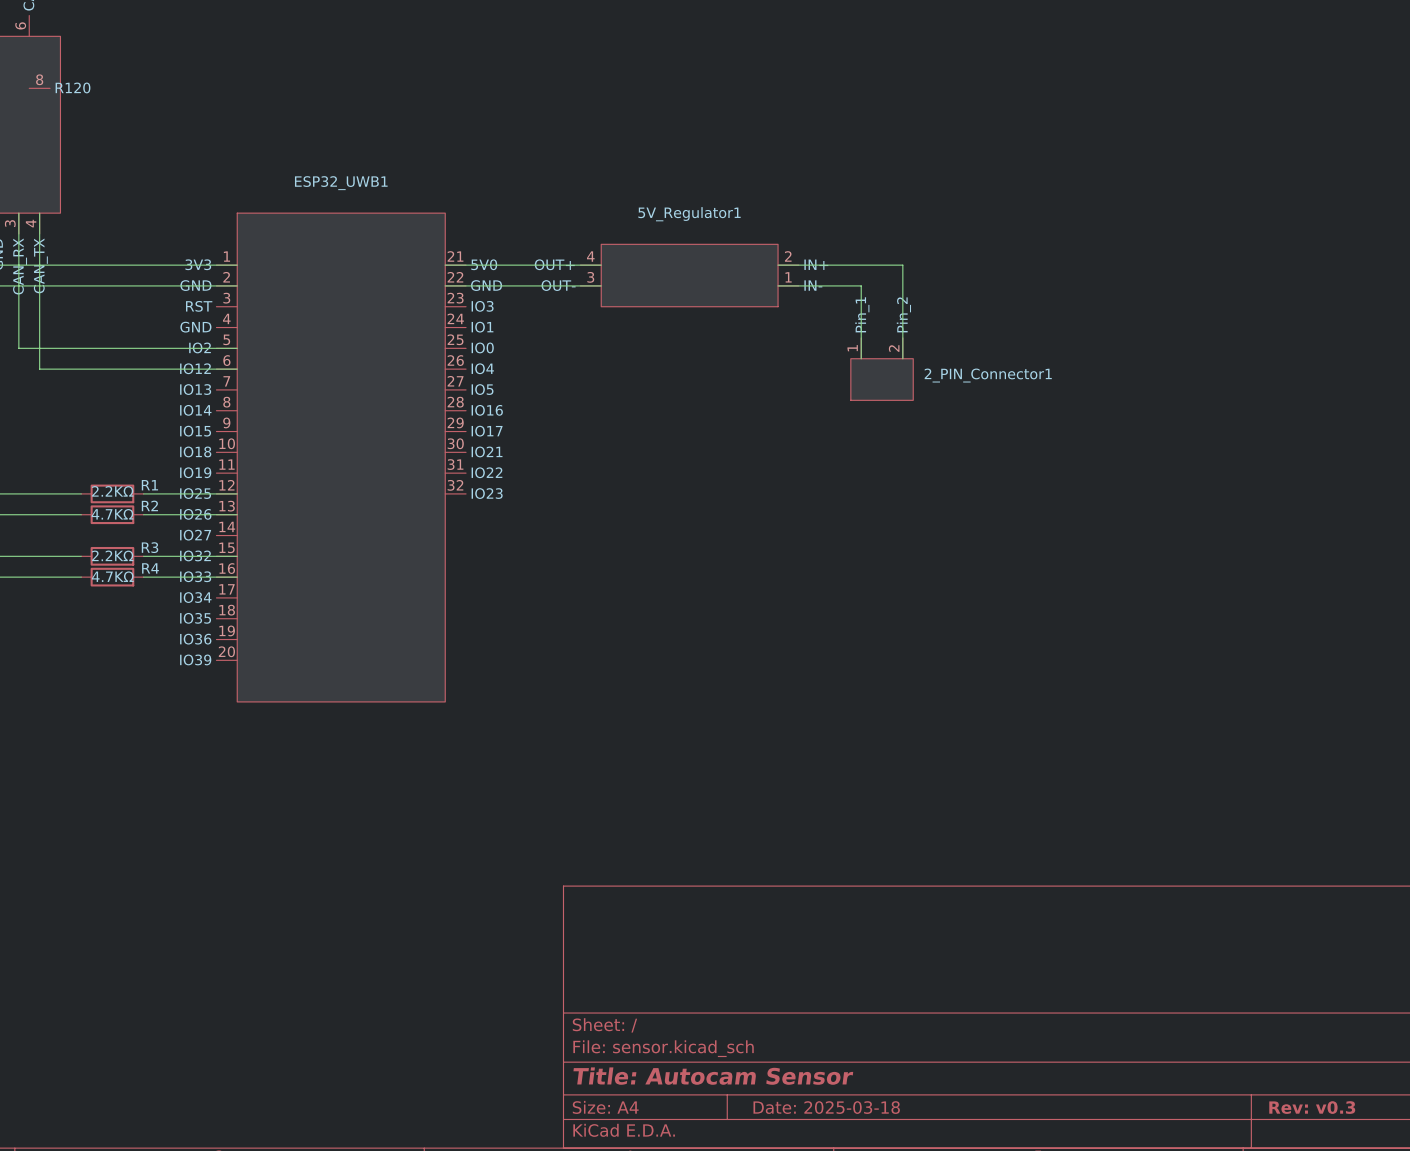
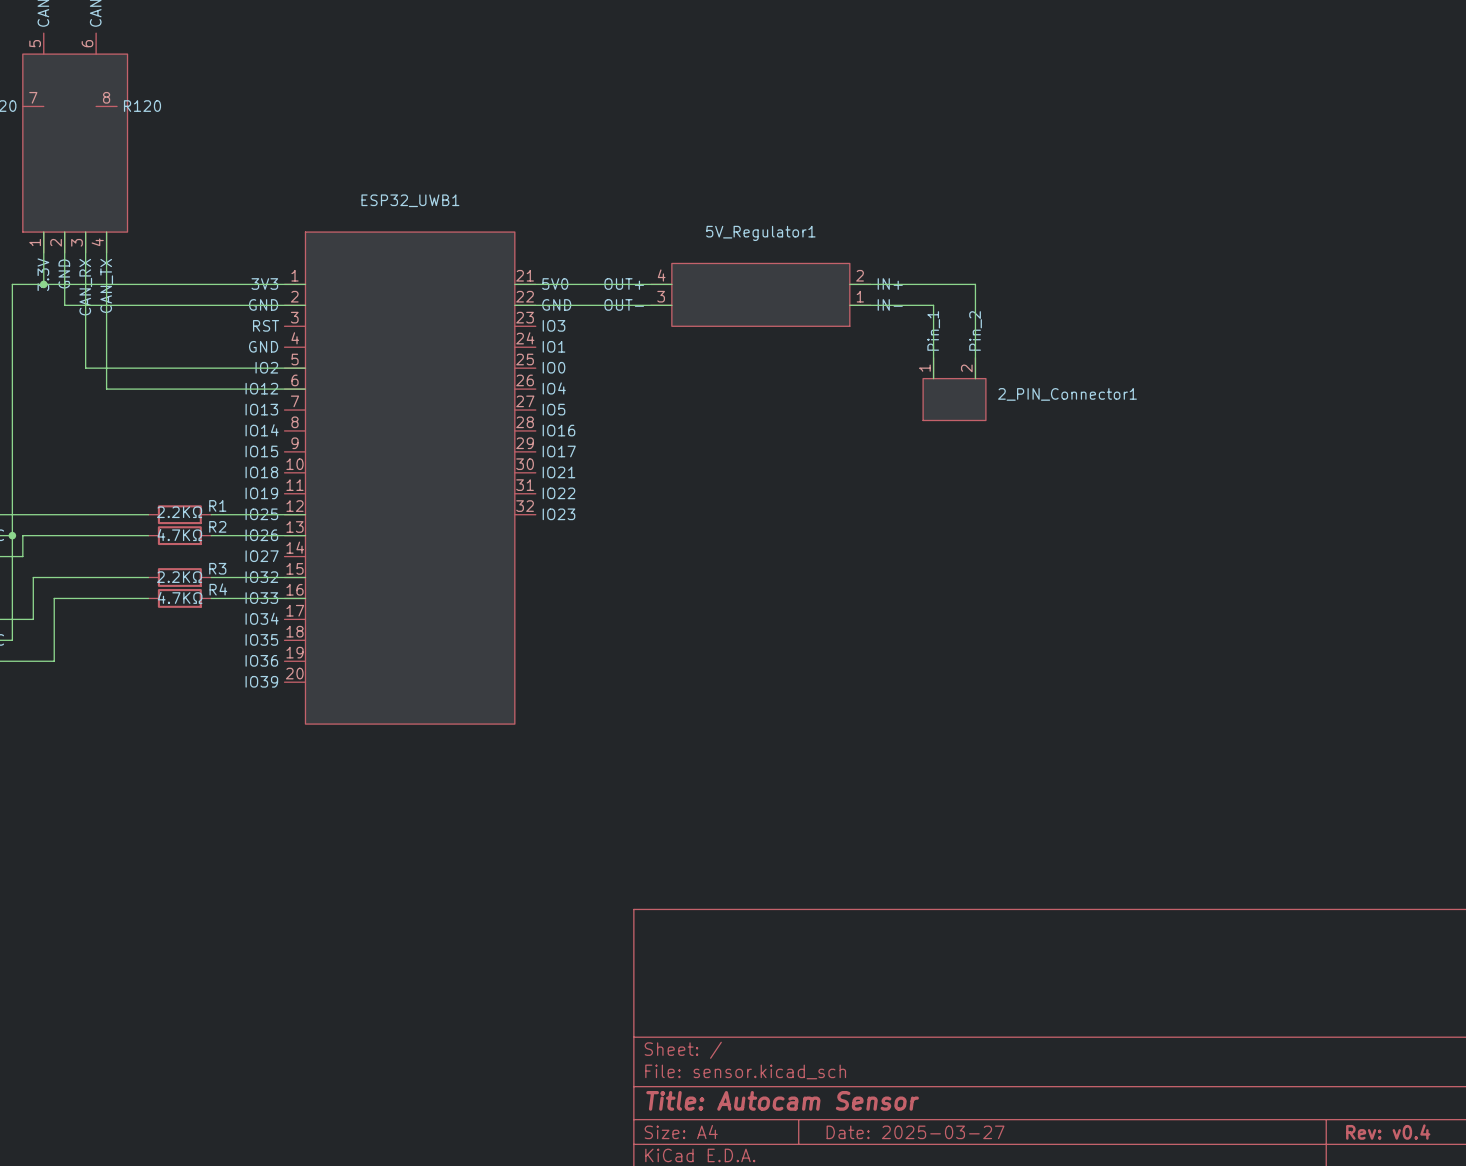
title block: Date: 2025-03-18 (826, 1107) -> Date: 2025-03-27 (915, 1132)
title block: Rev: v0.3 (1312, 1107) -> Rev: v0.4 (1388, 1132)

